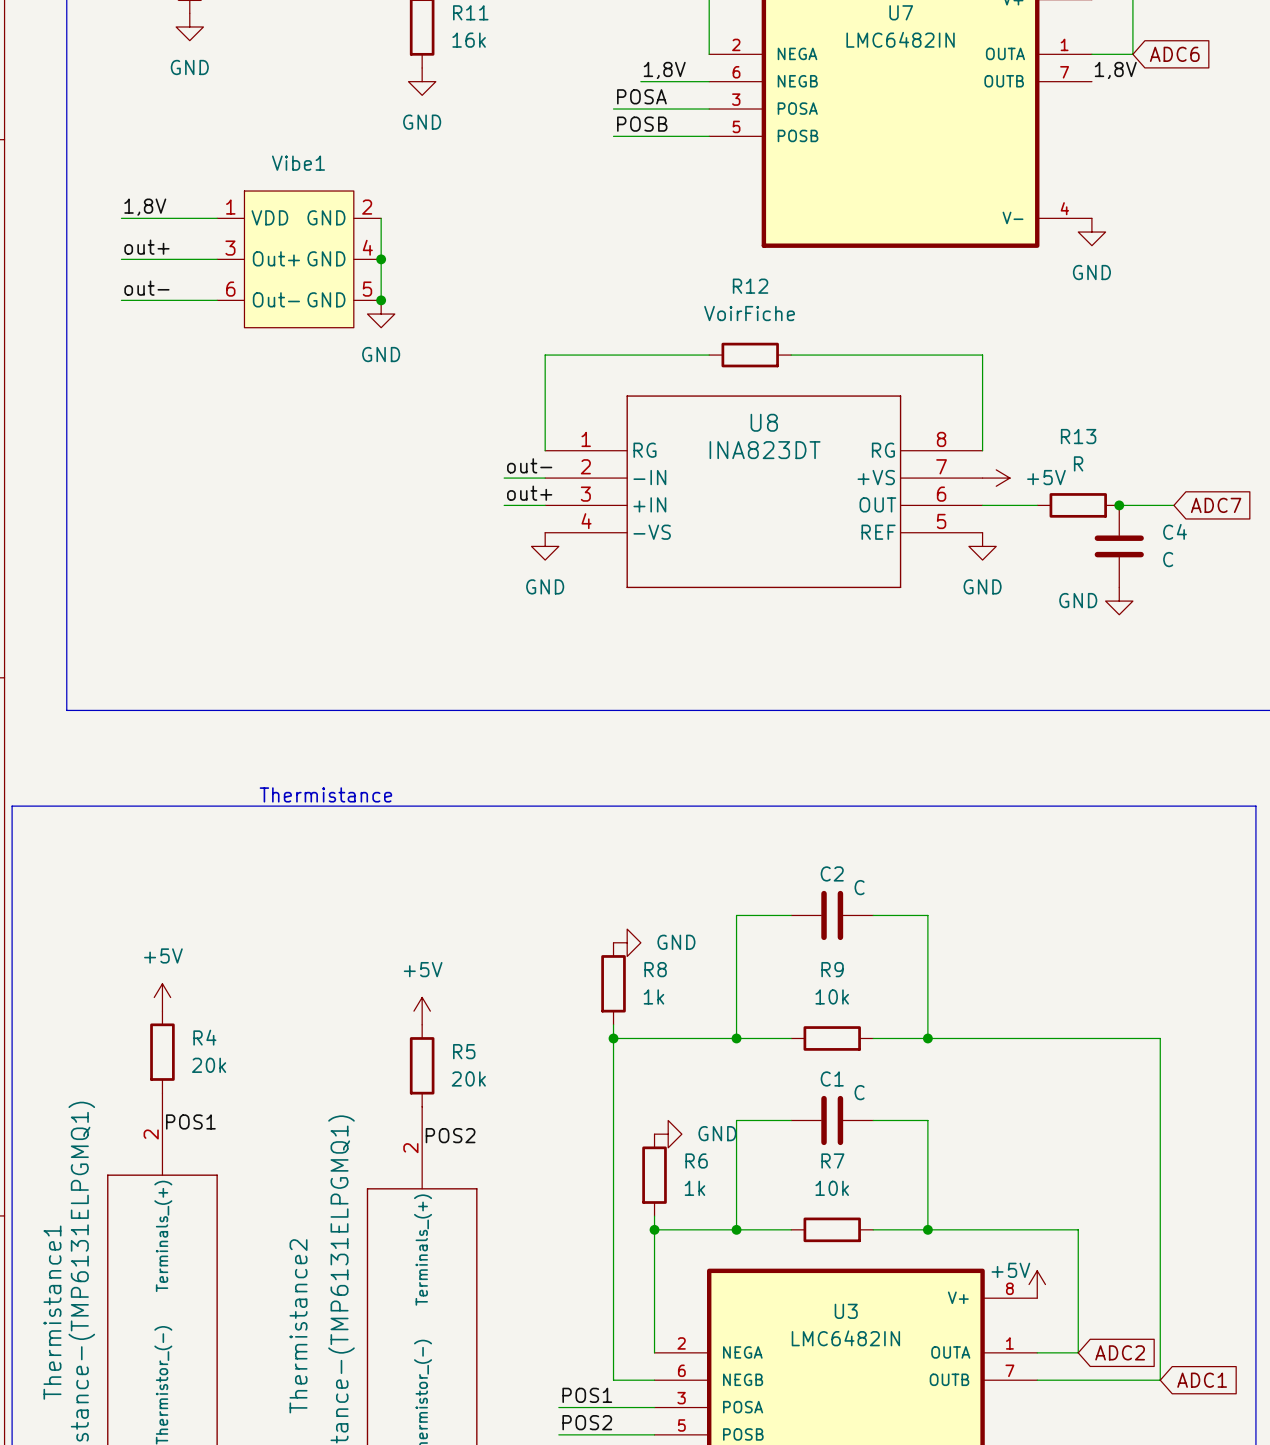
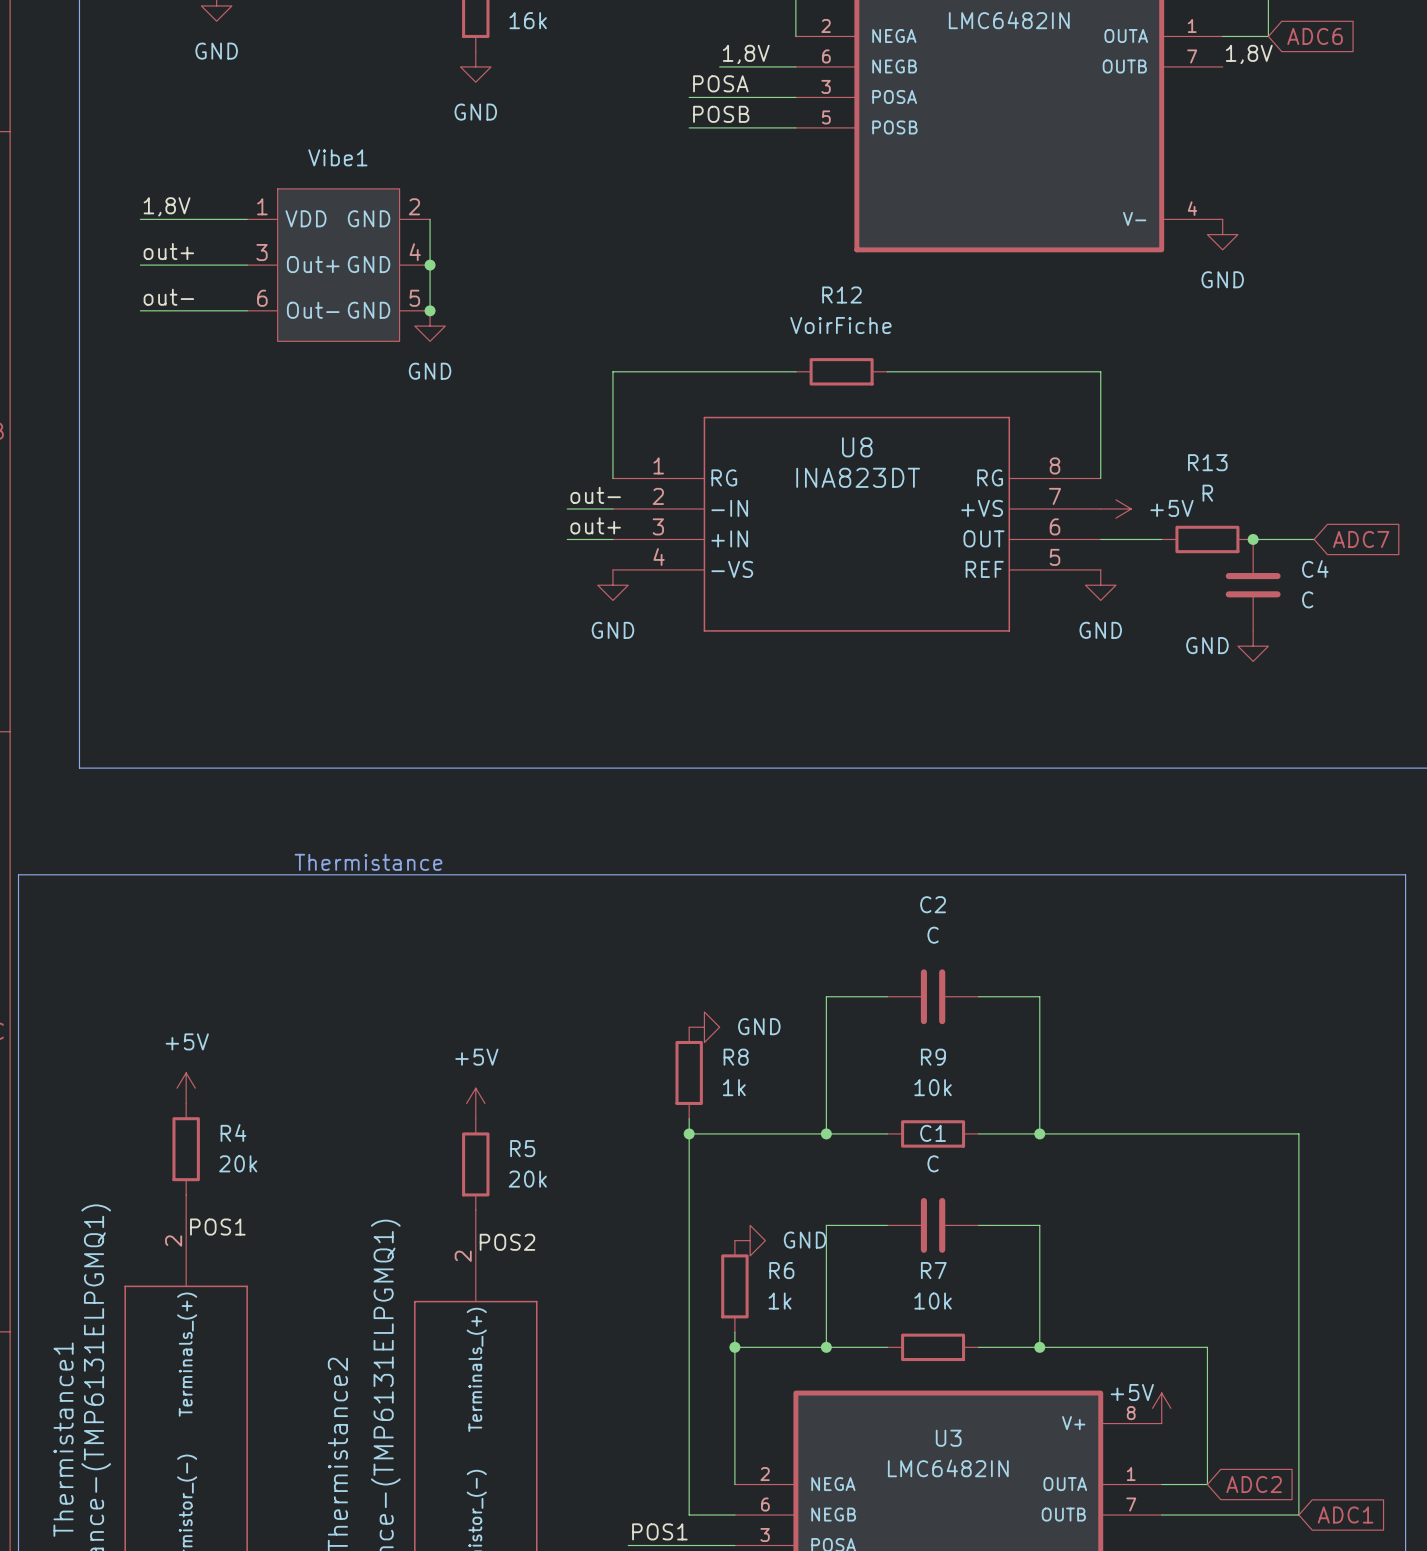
C2 name position: C2 (832, 873) -> C2 (933, 904)
C2 value position: C (859, 887) -> C (933, 935)
C1 name position: C1 (832, 1078) -> C1 (933, 1133)
C1 value position: C (859, 1092) -> C (933, 1163)

